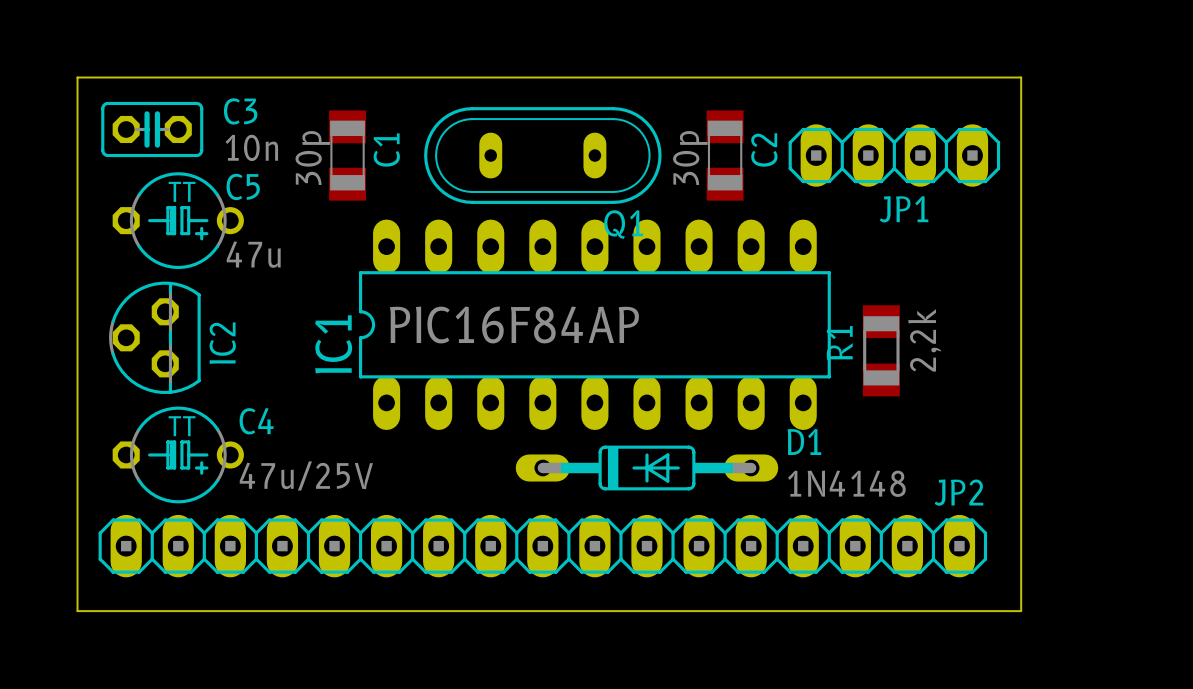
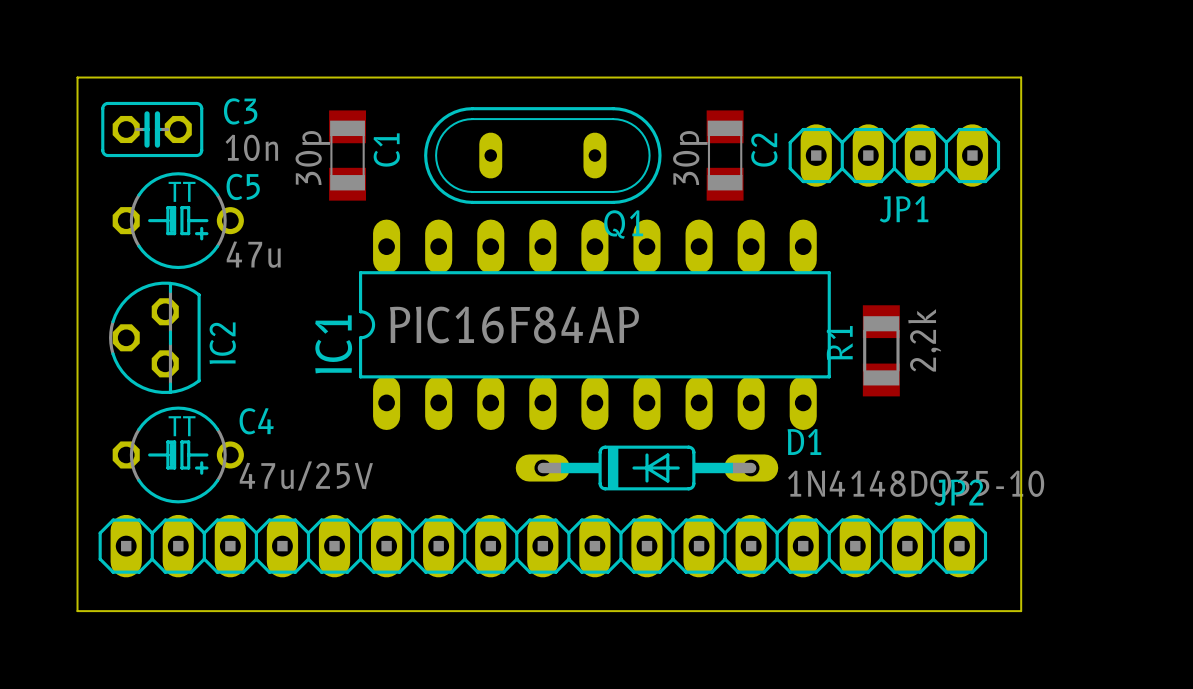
D1 value: 1N4148 (846, 483) -> 1N4148DO35-10 (916, 483)

